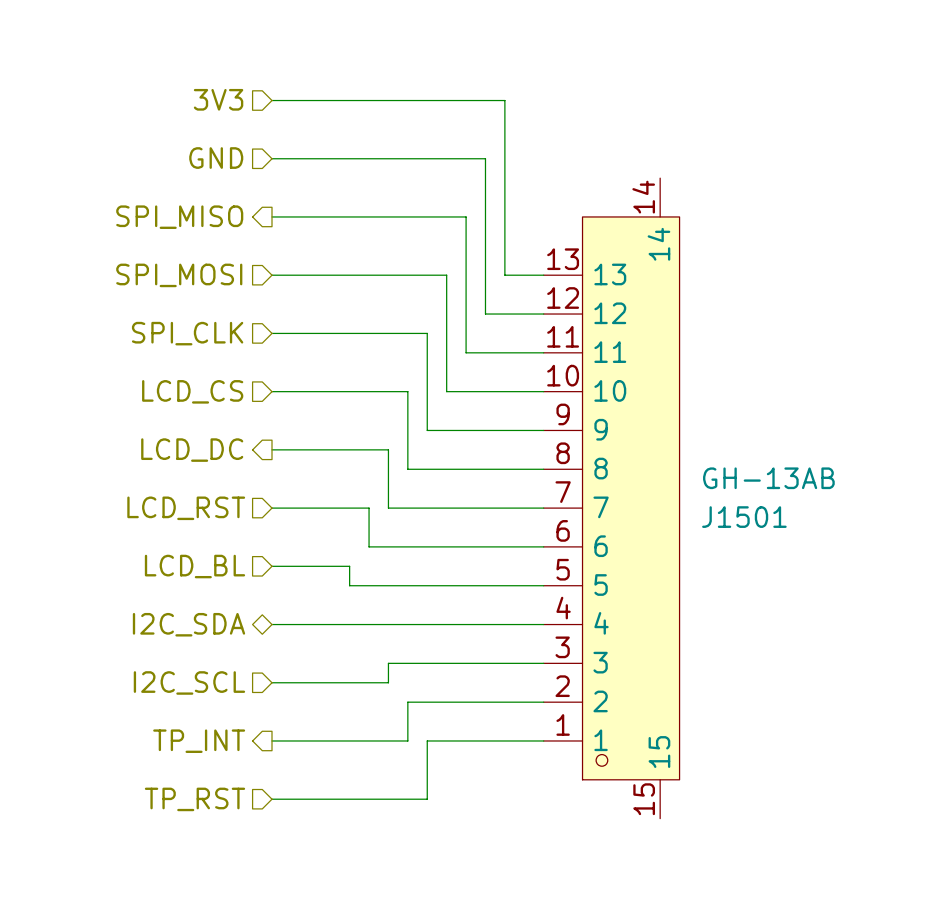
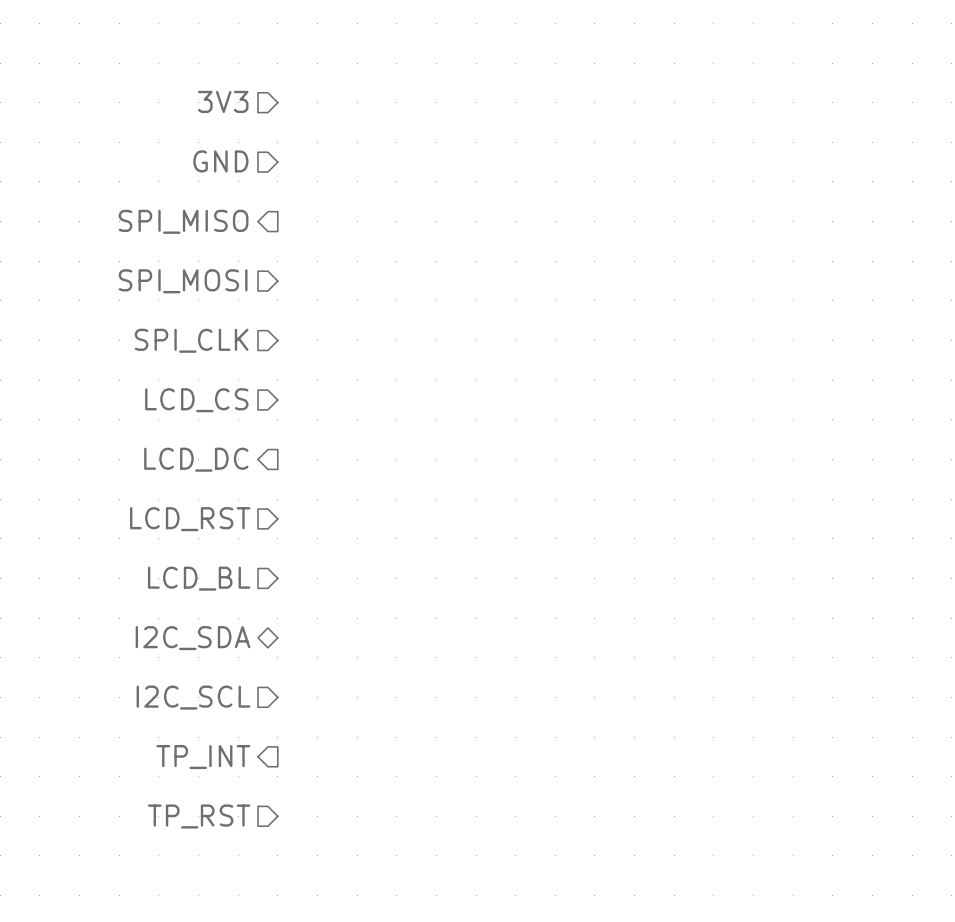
wire: (272, 100) (504, 100) (504, 275) (543, 275) -> none
wire: (272, 158) (485, 158) (485, 314) (543, 314) -> none
wire: (272, 216) (466, 216) (466, 352) (543, 352) -> none
wire: (272, 275) (446, 275) (446, 391) (543, 391) -> none
wire: (272, 333) (427, 333) (427, 430) (543, 430) -> none
wire: (272, 391) (407, 391) (407, 469) (543, 469) -> none
wire: (272, 449) (388, 449) (388, 508) (543, 508) -> none
J1501: GH-13AB (611, 498) -> none
wire: (272, 508) (369, 508) (369, 546) (543, 546) -> none
wire: (272, 566) (349, 566) (349, 585) (543, 585) -> none
wire: (272, 624) (543, 624) -> none
wire: (543, 663) (388, 663) (388, 682) (272, 682) -> none
wire: (543, 702) (407, 702) (407, 740) (272, 740) -> none
wire: (543, 740) (427, 740) (427, 799) (272, 799) -> none

